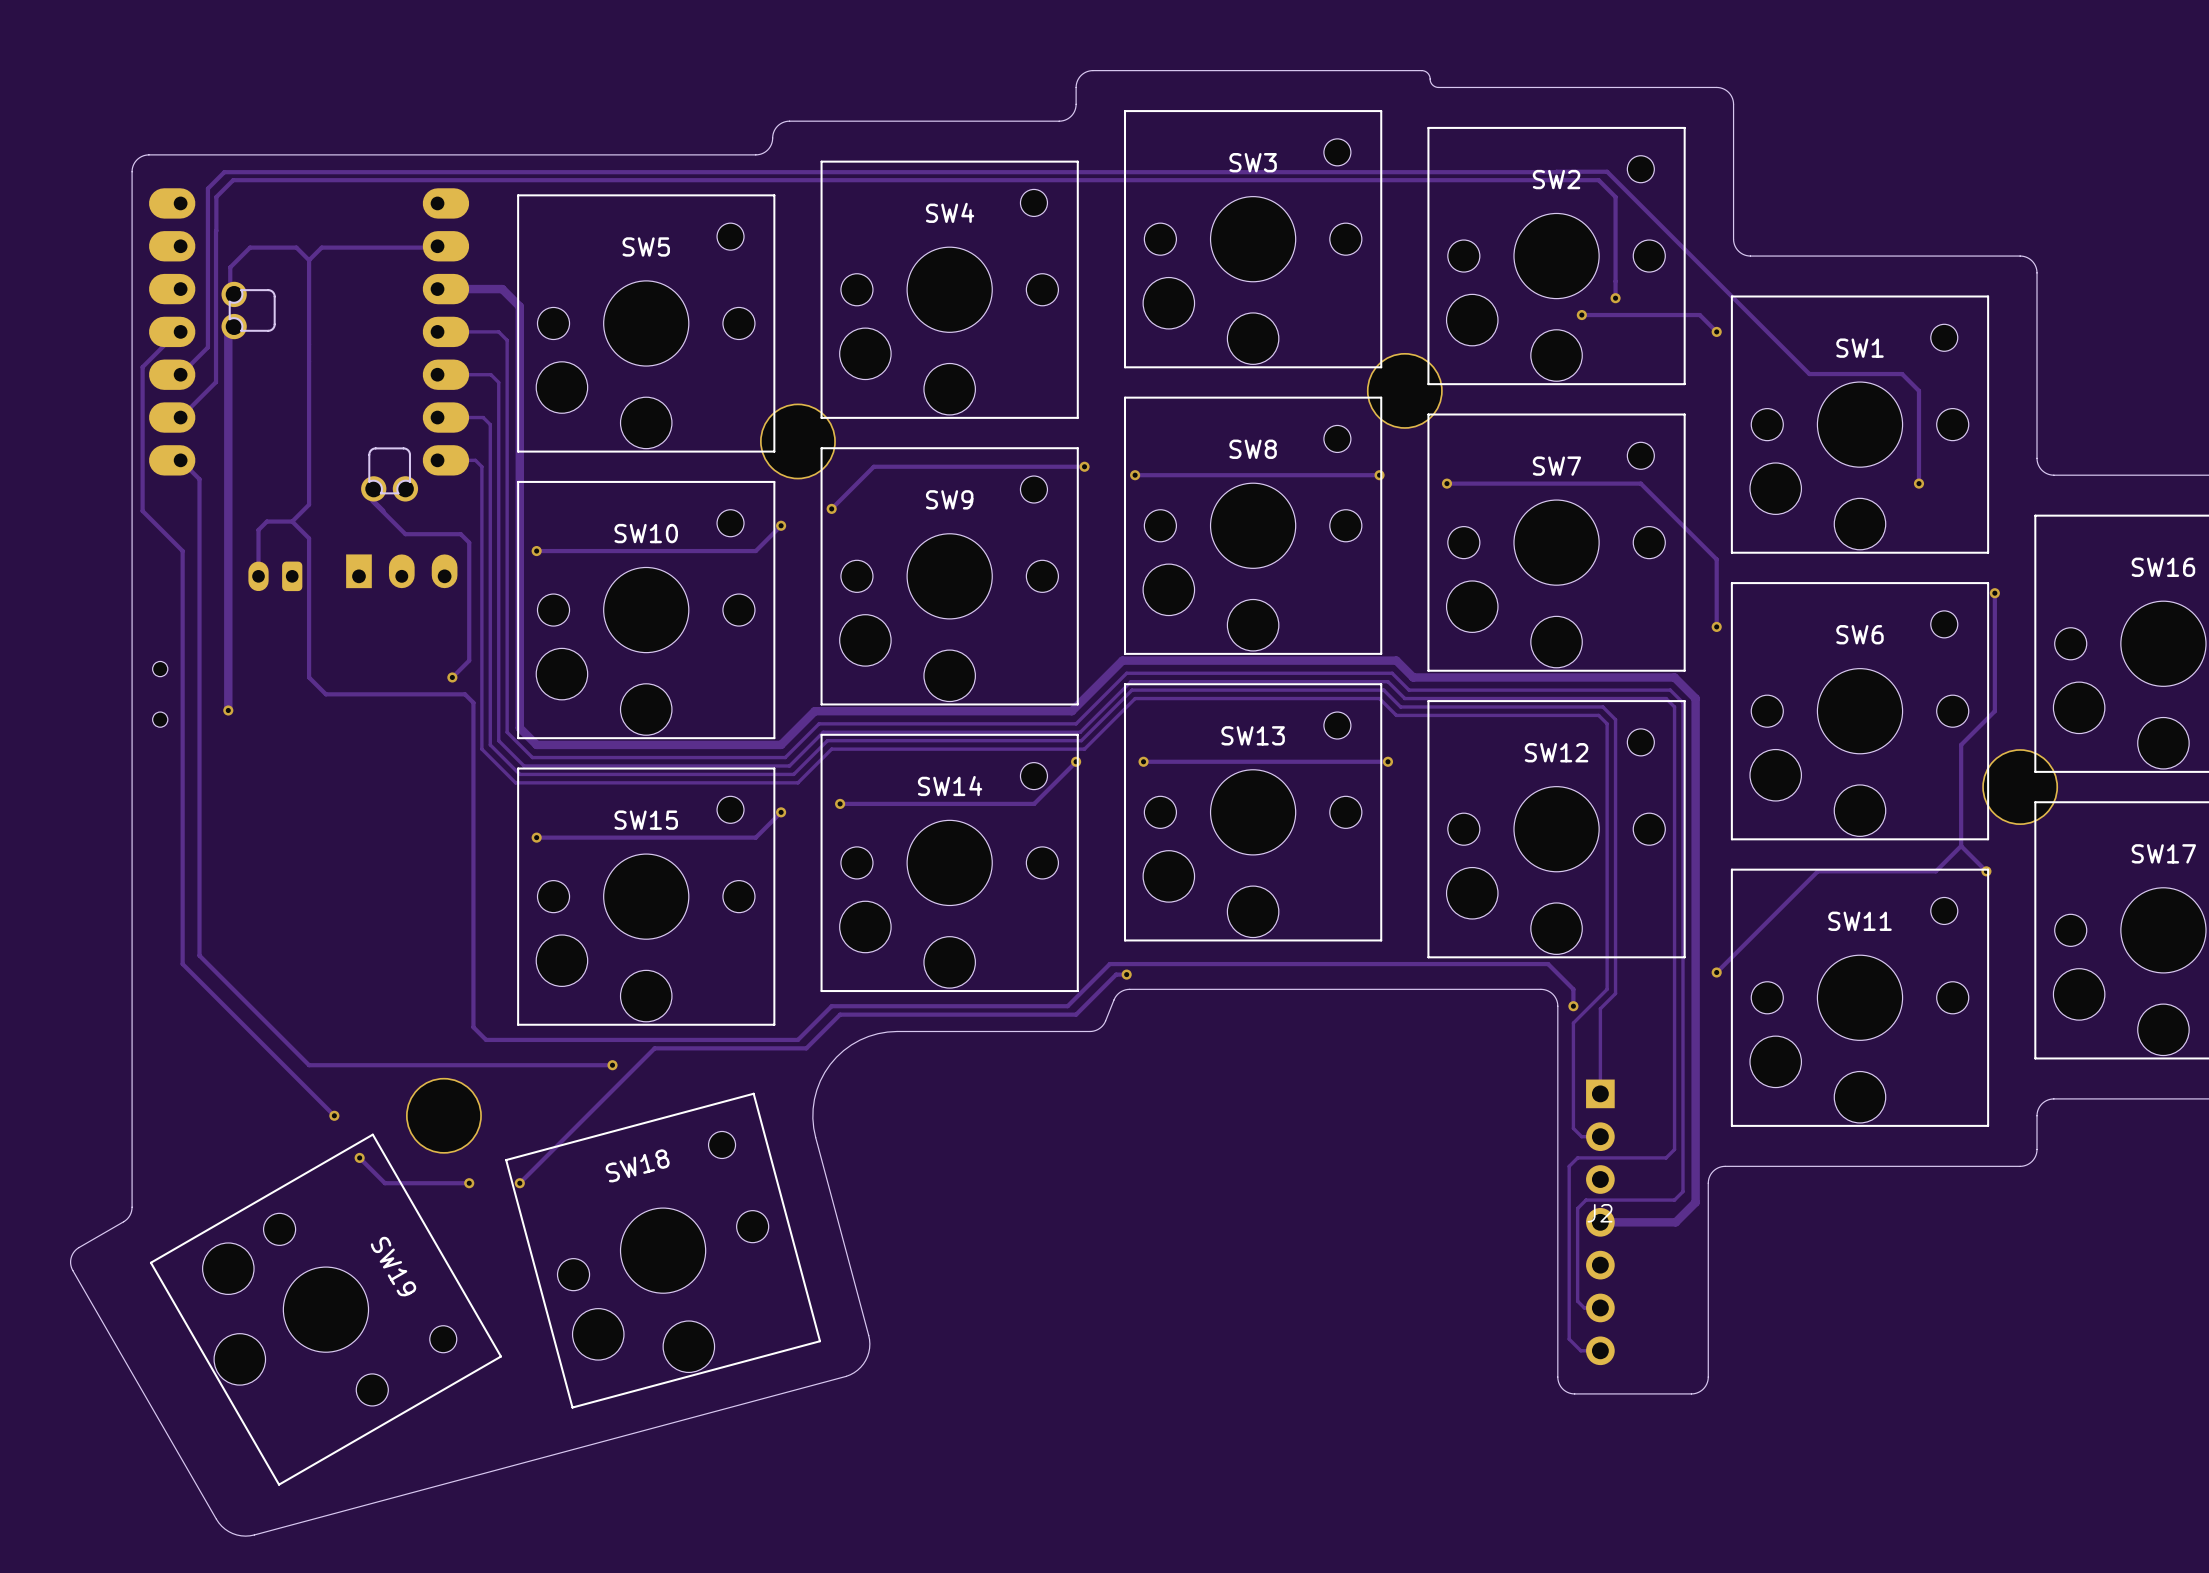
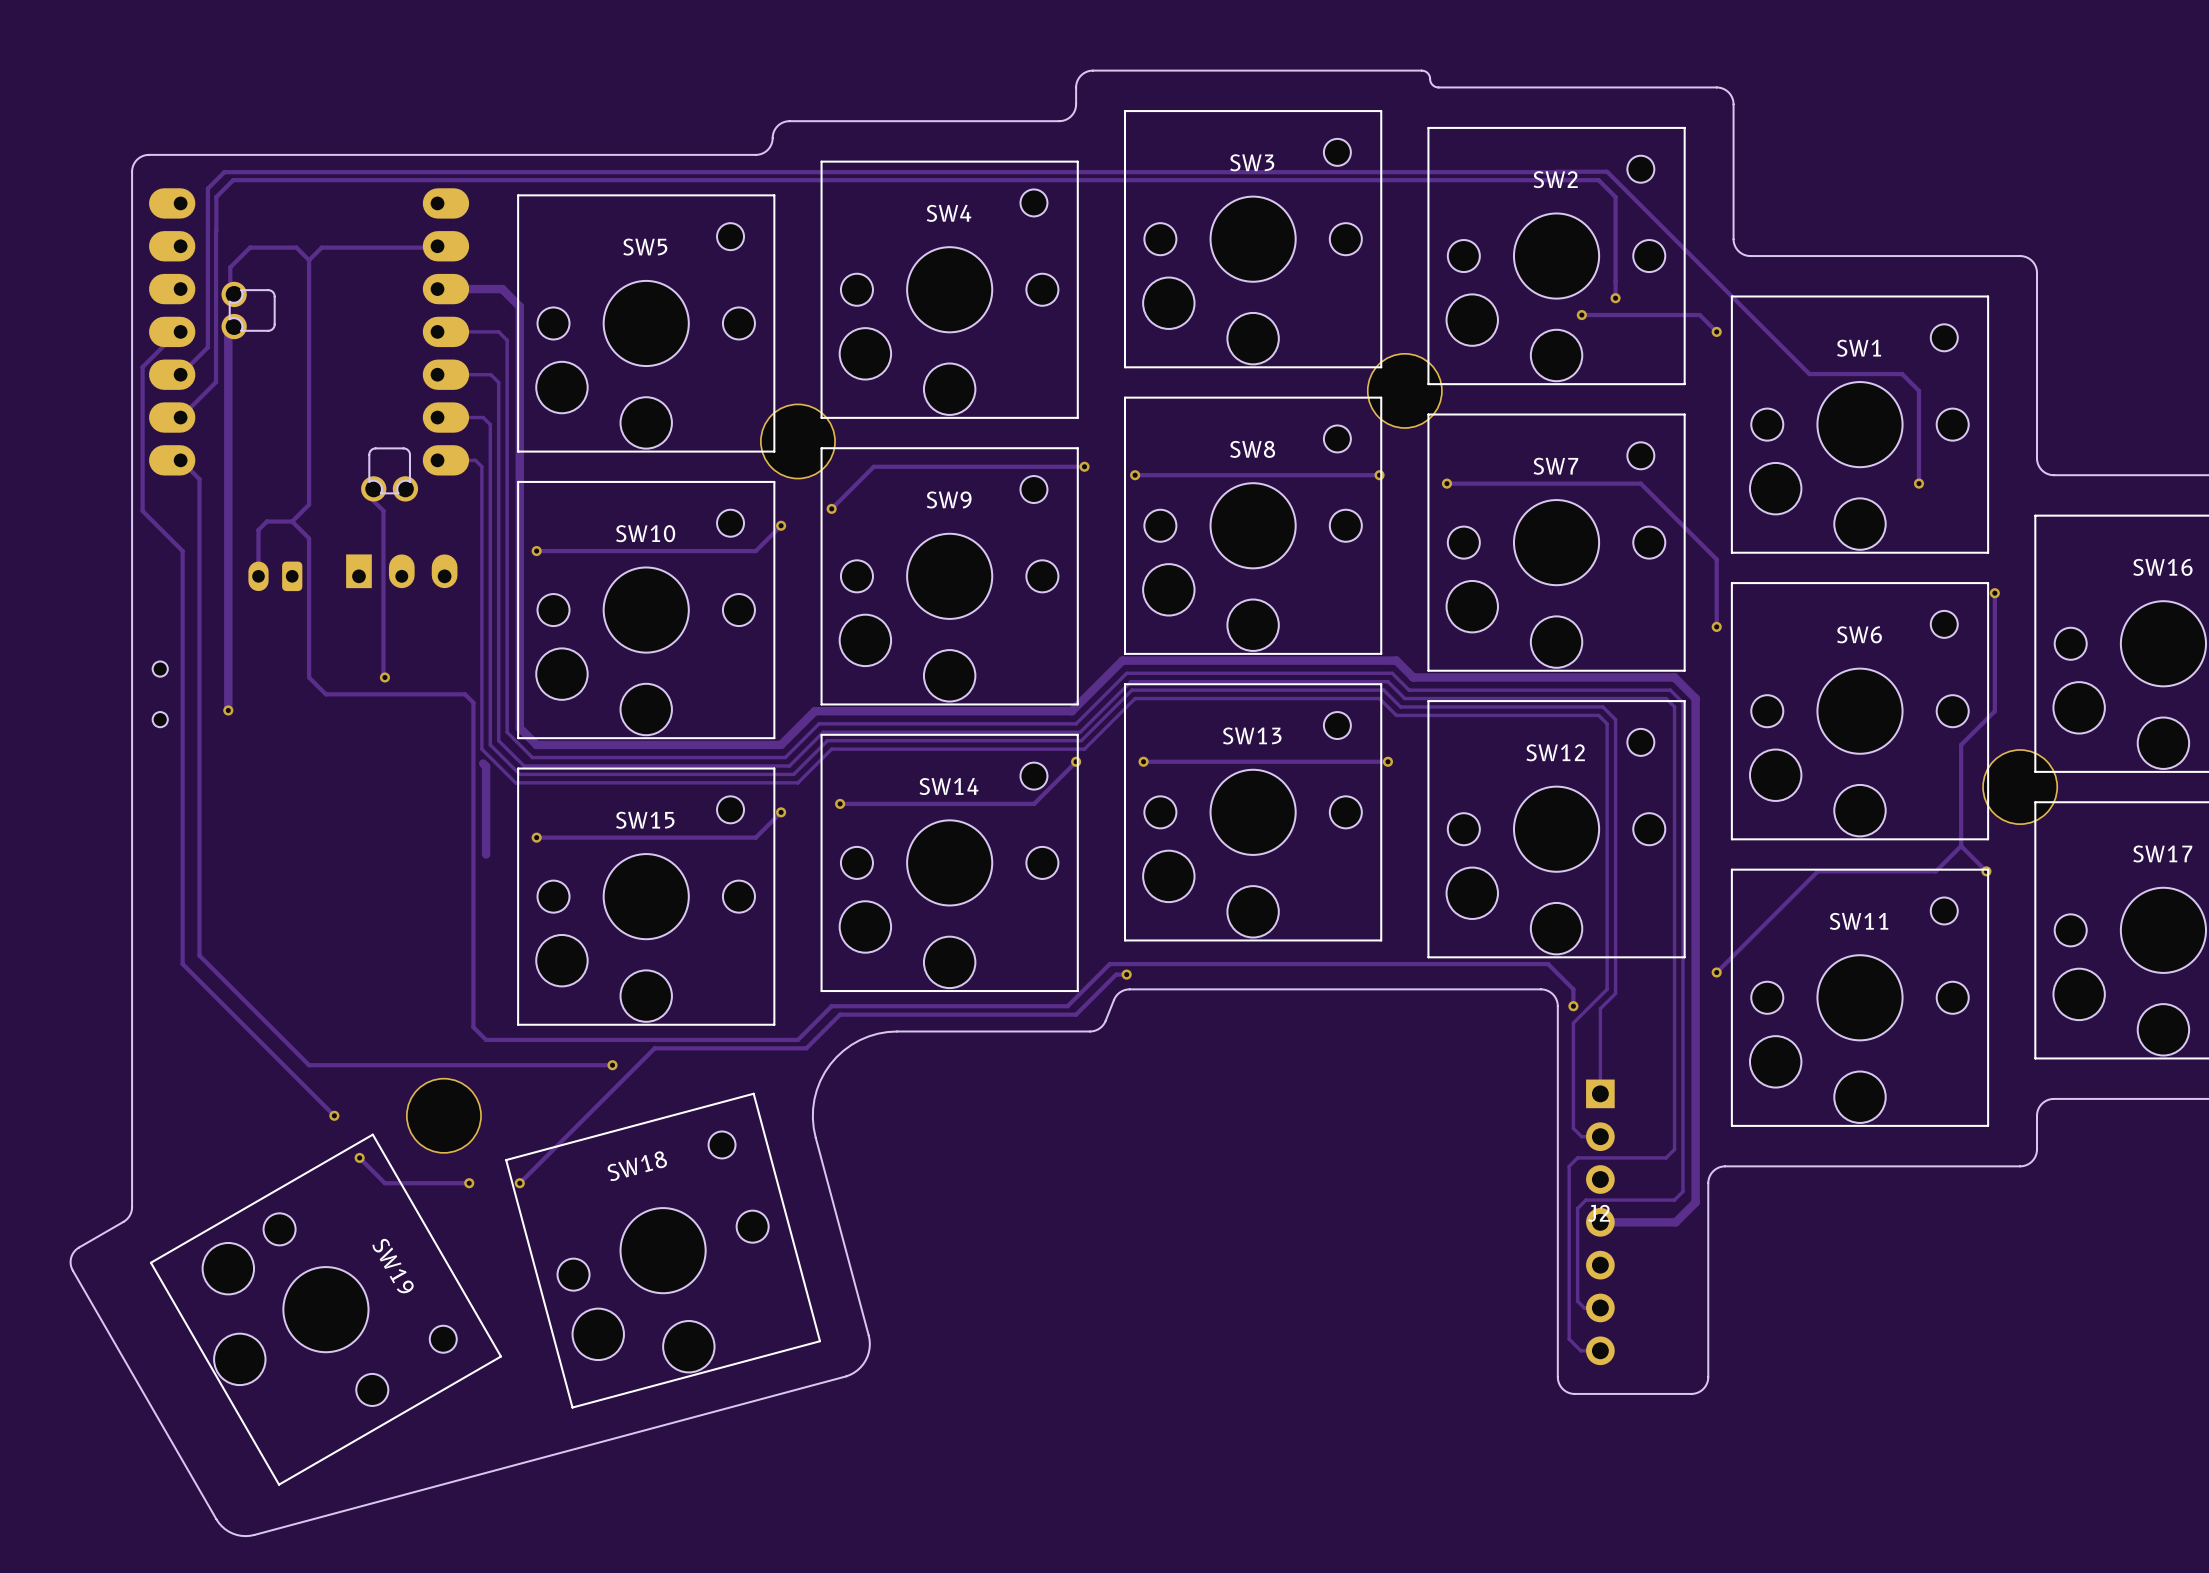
track: (372, 500) (405, 534) (460, 534) (469, 542) (469, 660) (452, 677) -> none
track: none -> (383, 510) (384, 677)
via position: (452, 677) -> (384, 677)
track: none -> (483, 763) (486, 766) (486, 854)

